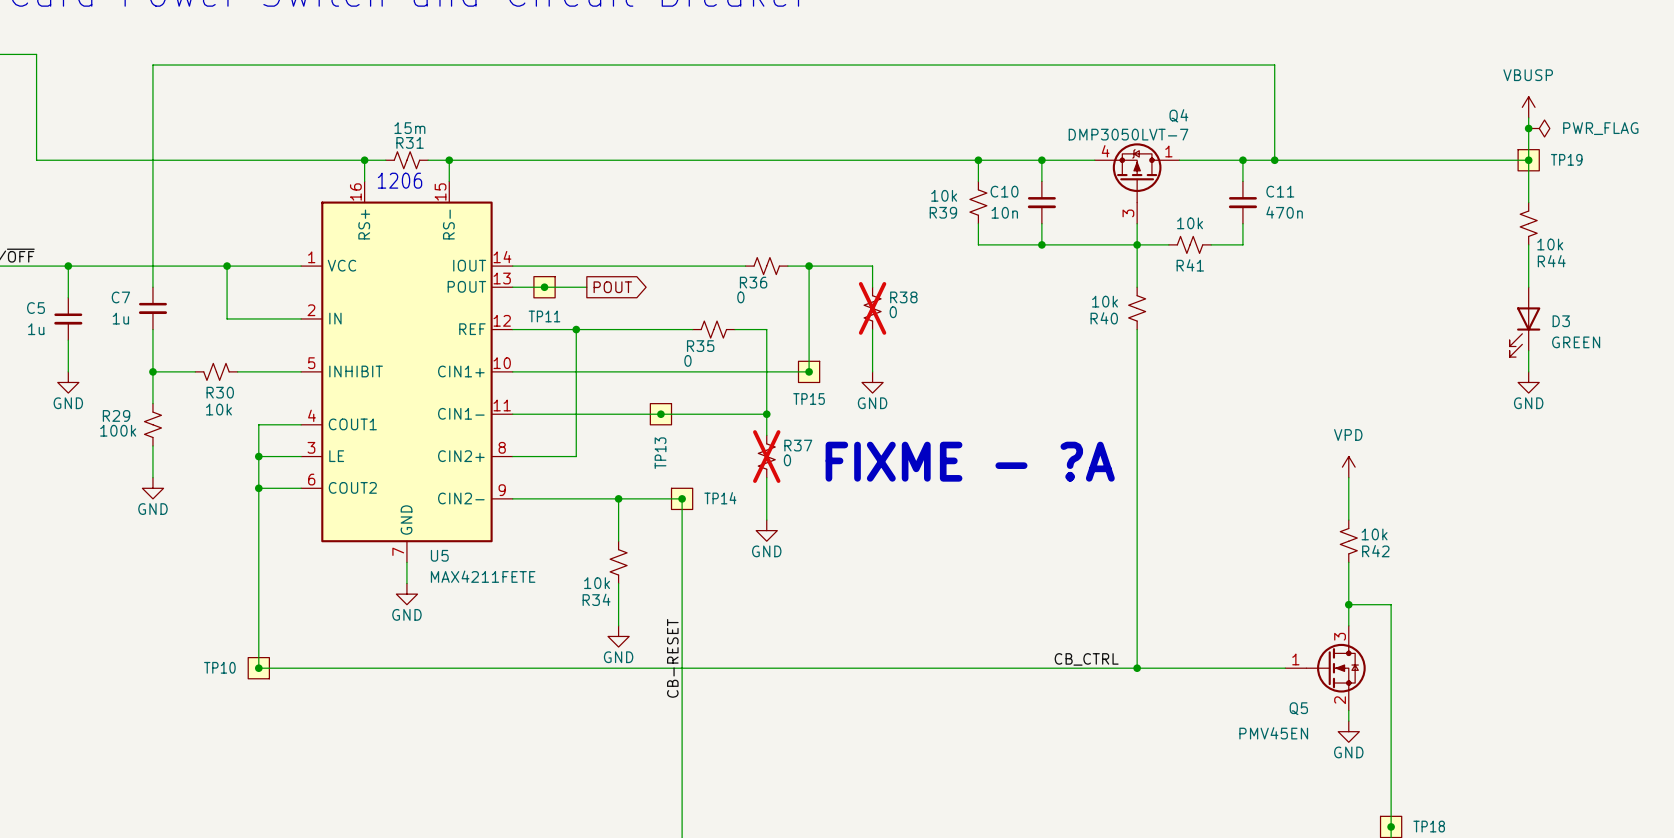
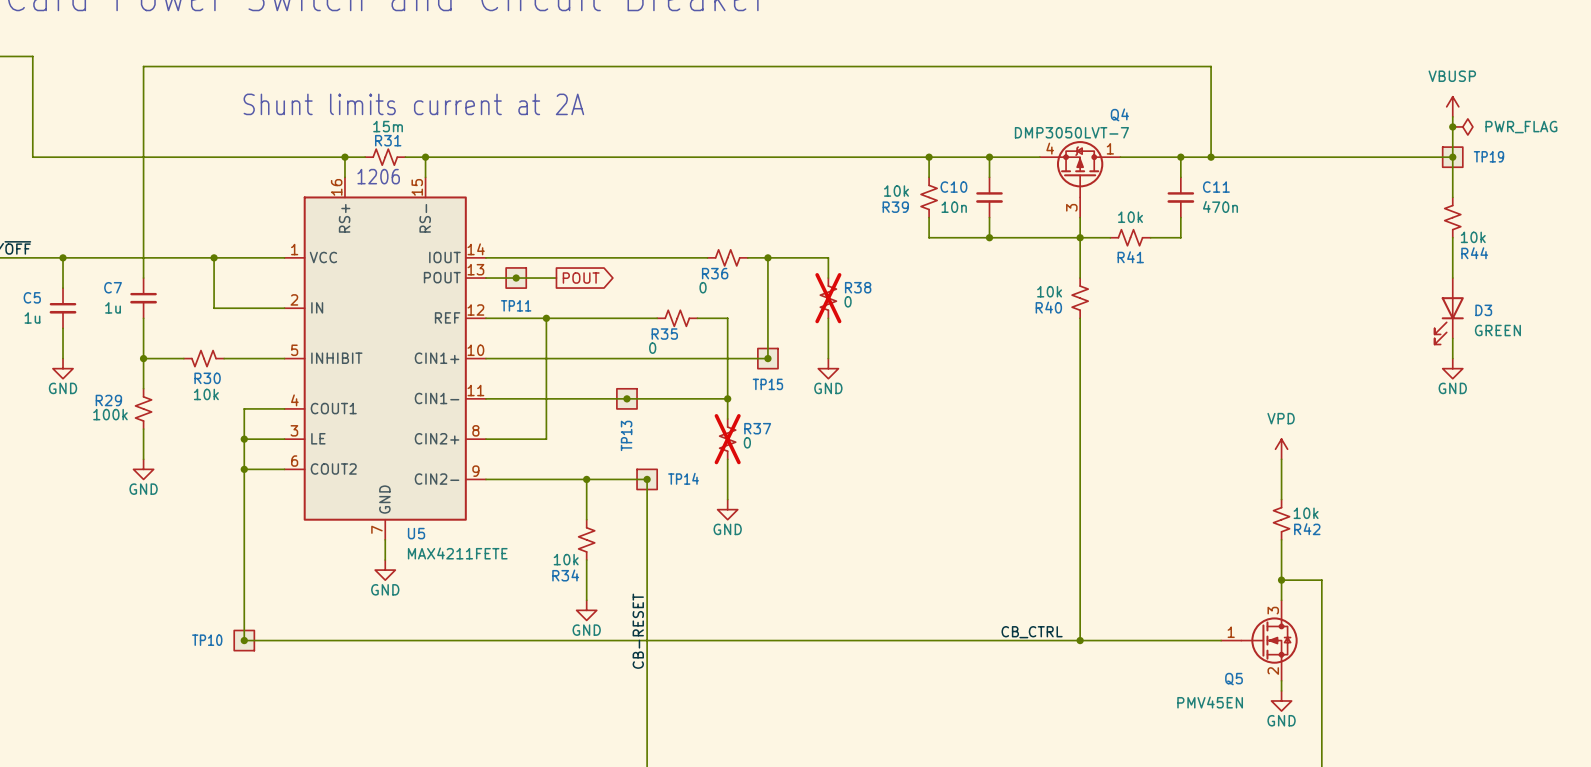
text: none -> Shunt limits current at 2A (413, 104)
text: FIXME - ?A (970, 461) -> none

